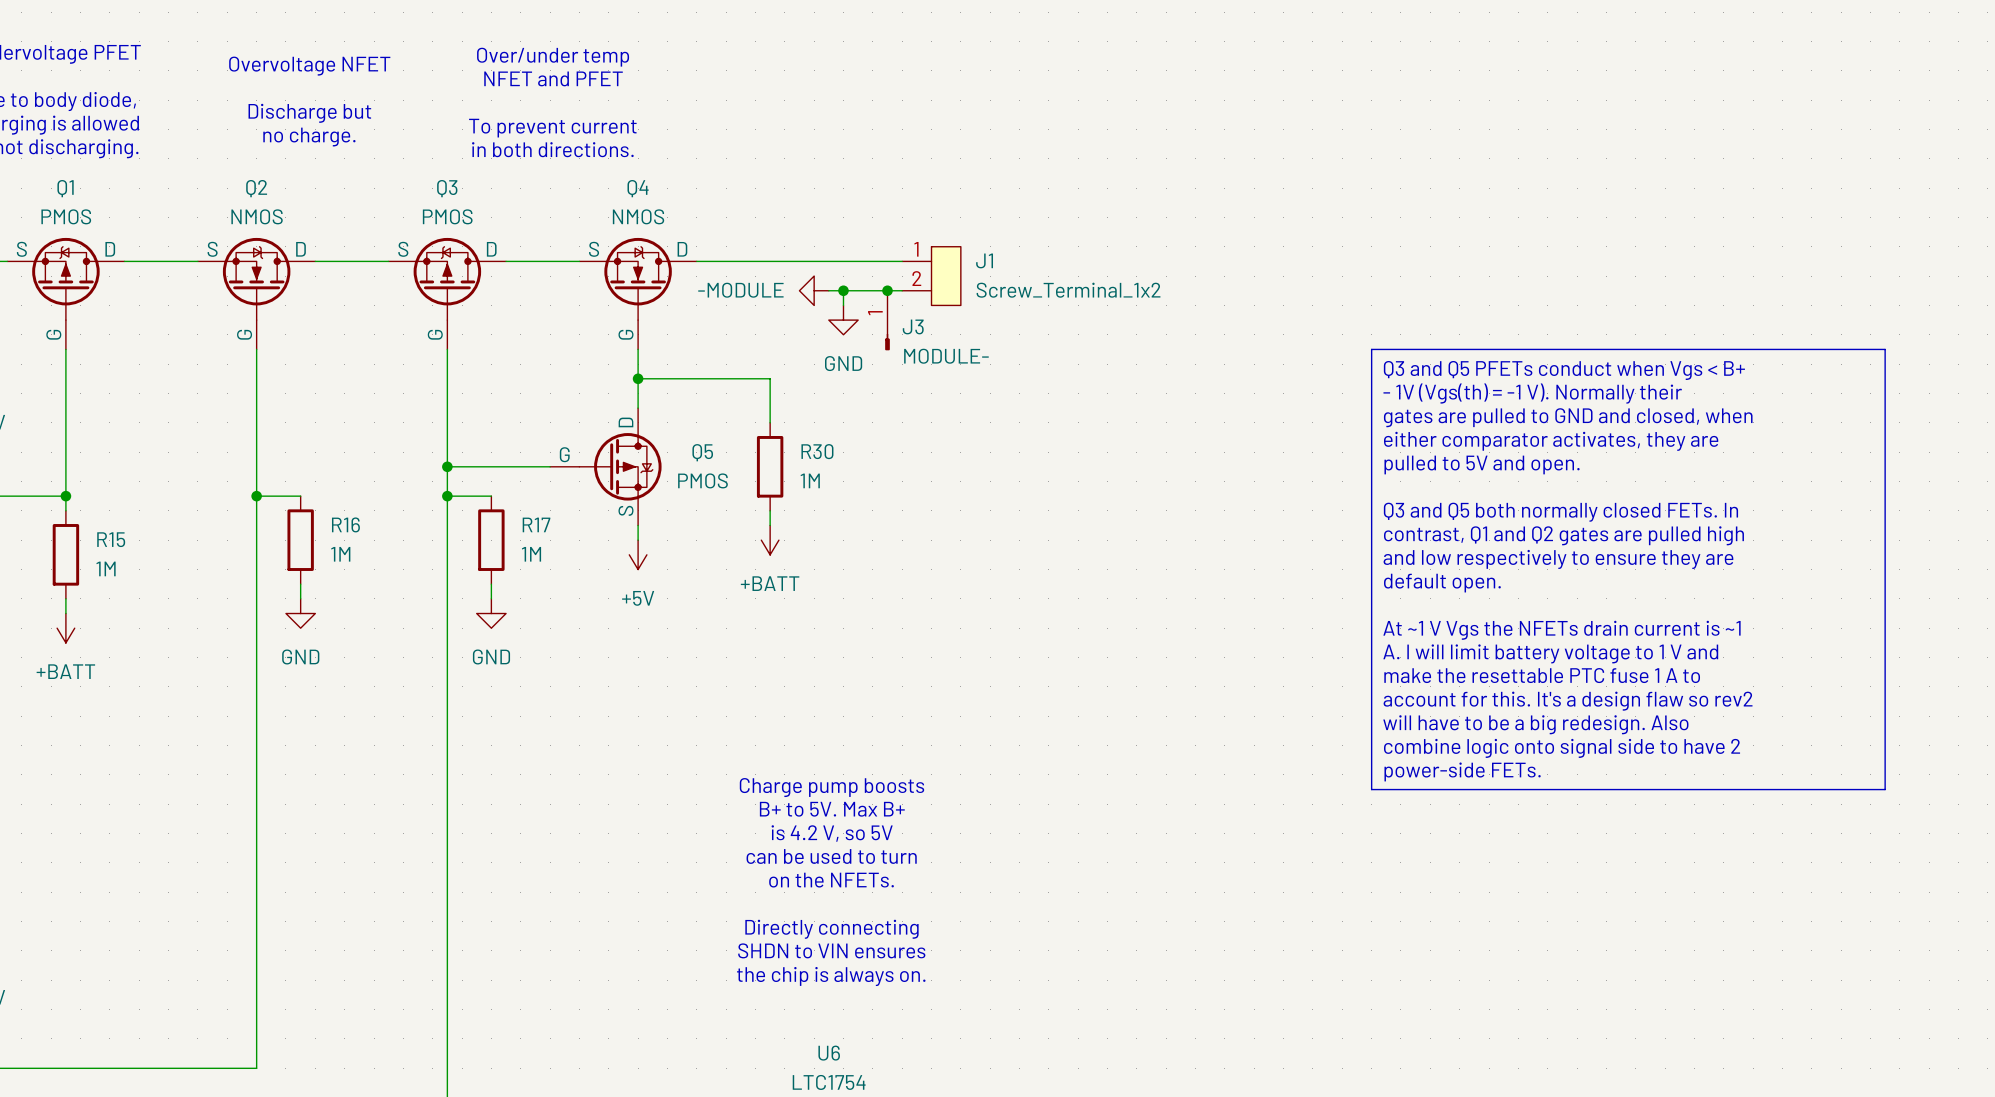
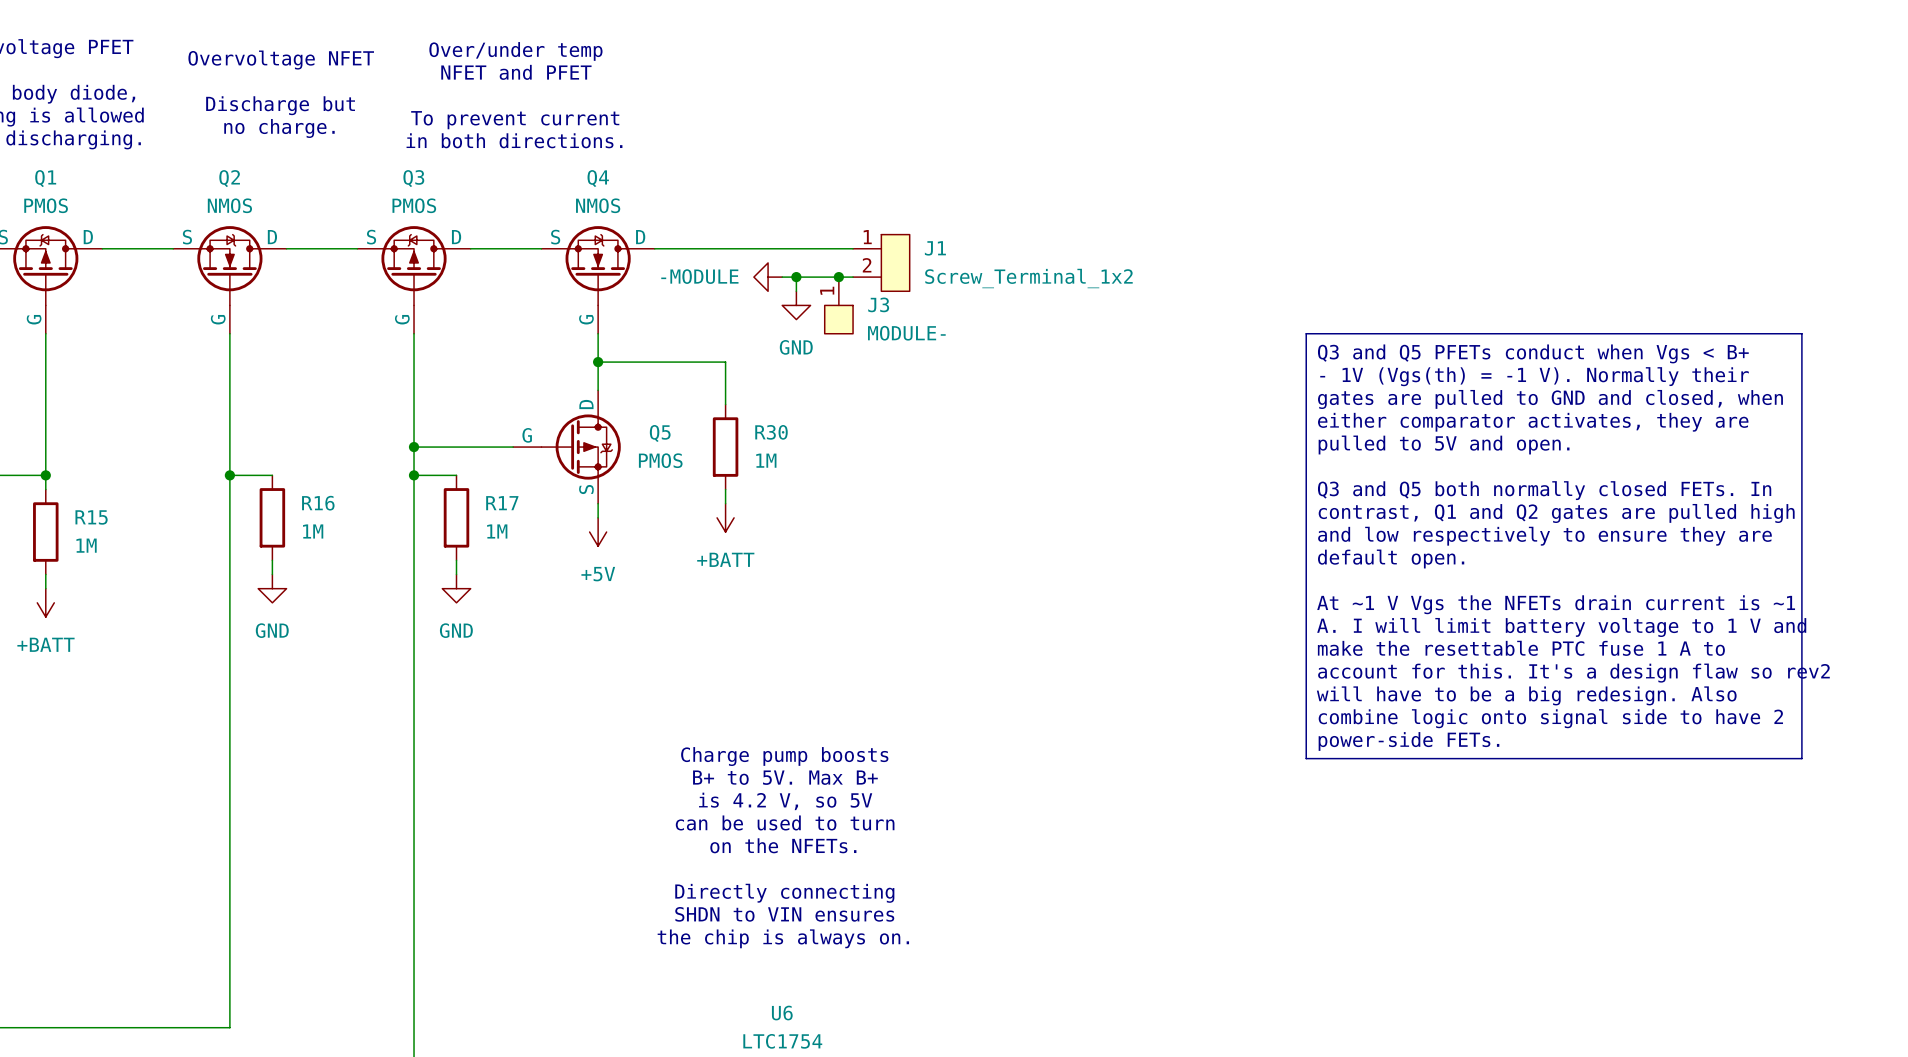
J3 symbol: [885, 290, 890, 351] -> [824, 277, 854, 334]

